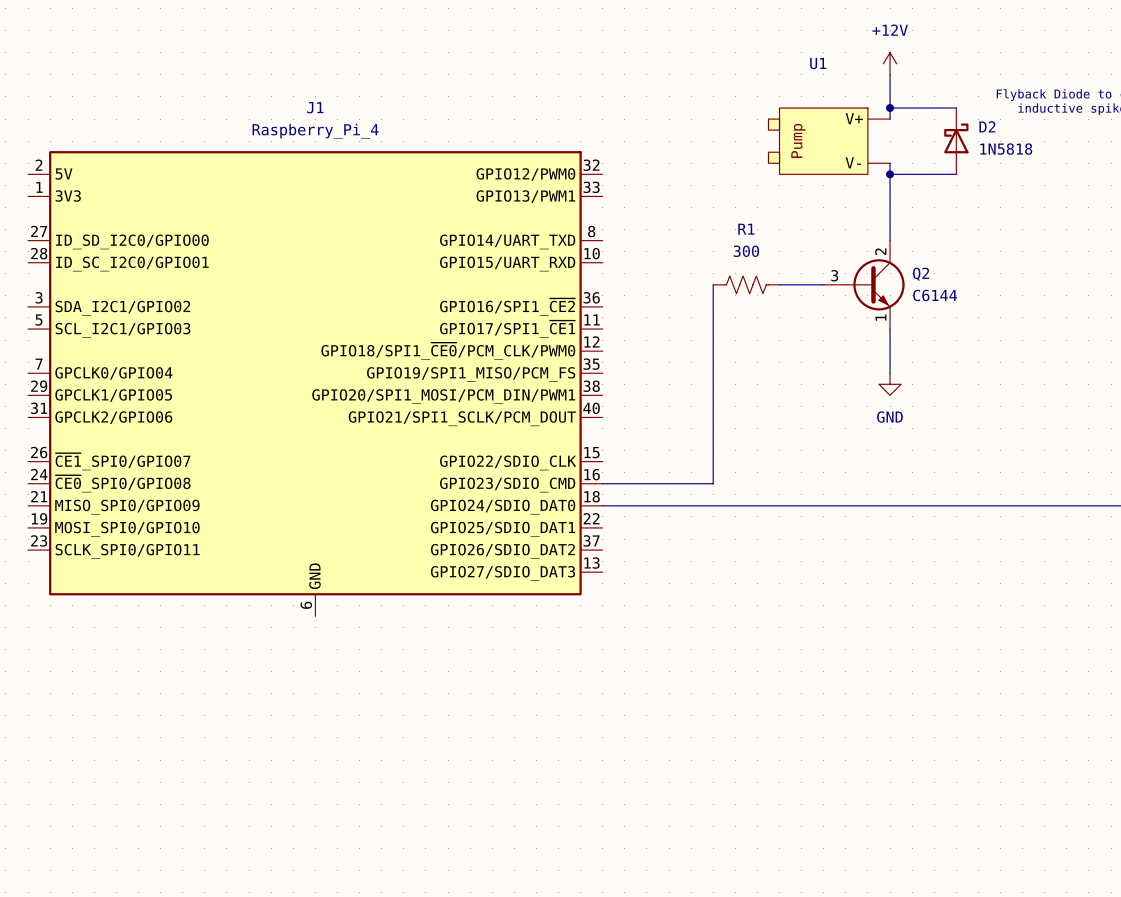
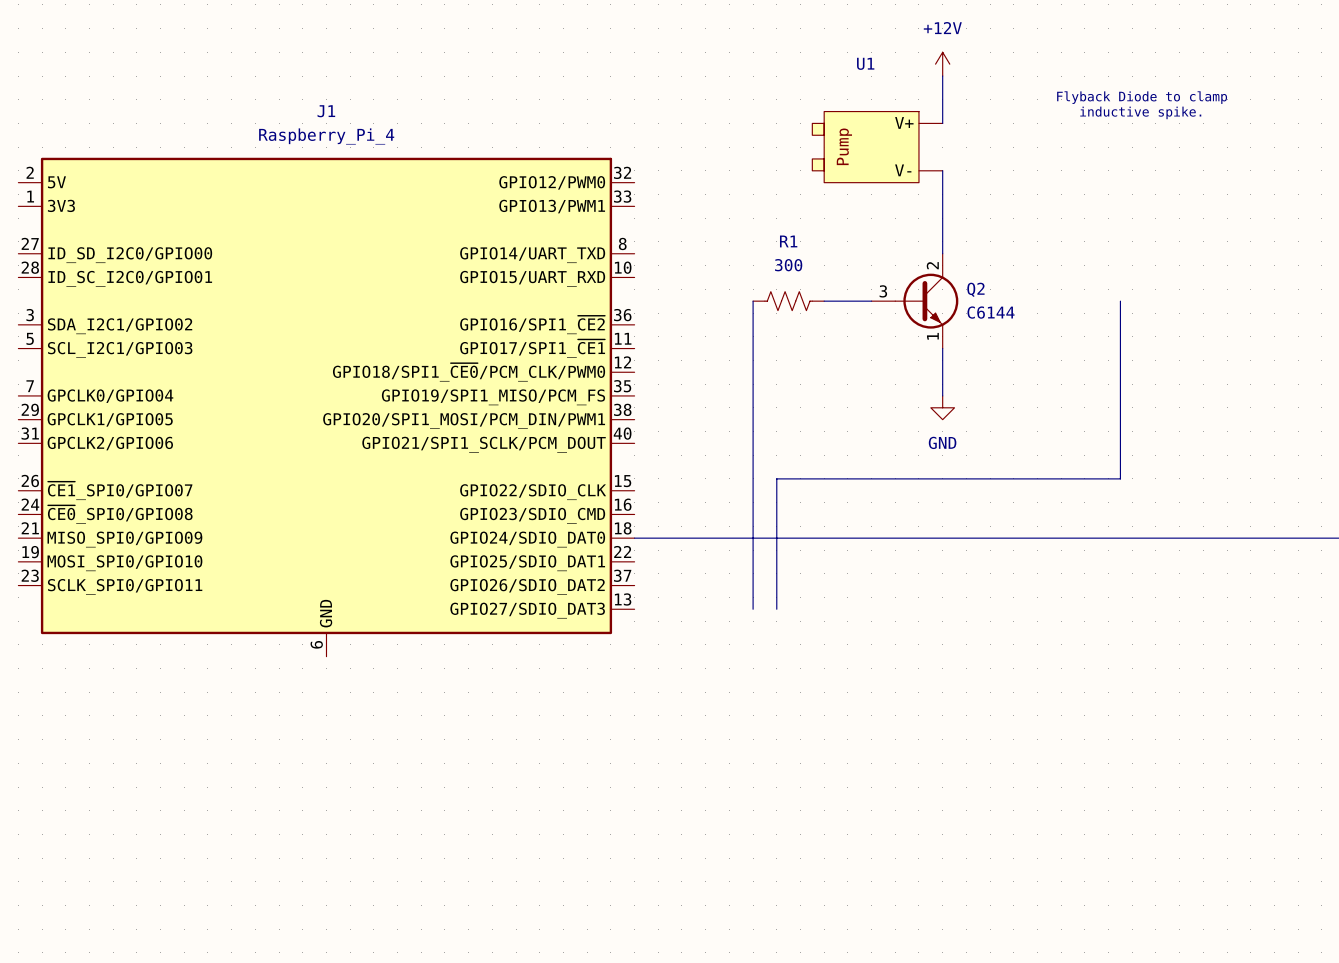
wire: (890, 108) (956, 108) -> none
junction: (890, 108) -> none
D2: 1N5818 (956, 141) -> none
wire: (890, 174) (956, 174) -> none
junction: (890, 174) -> none
wire: none -> (1120, 301) (1120, 478) (776, 478) (776, 609)
wire: (602, 483) (713, 483) -> (753, 609) (753, 514)

